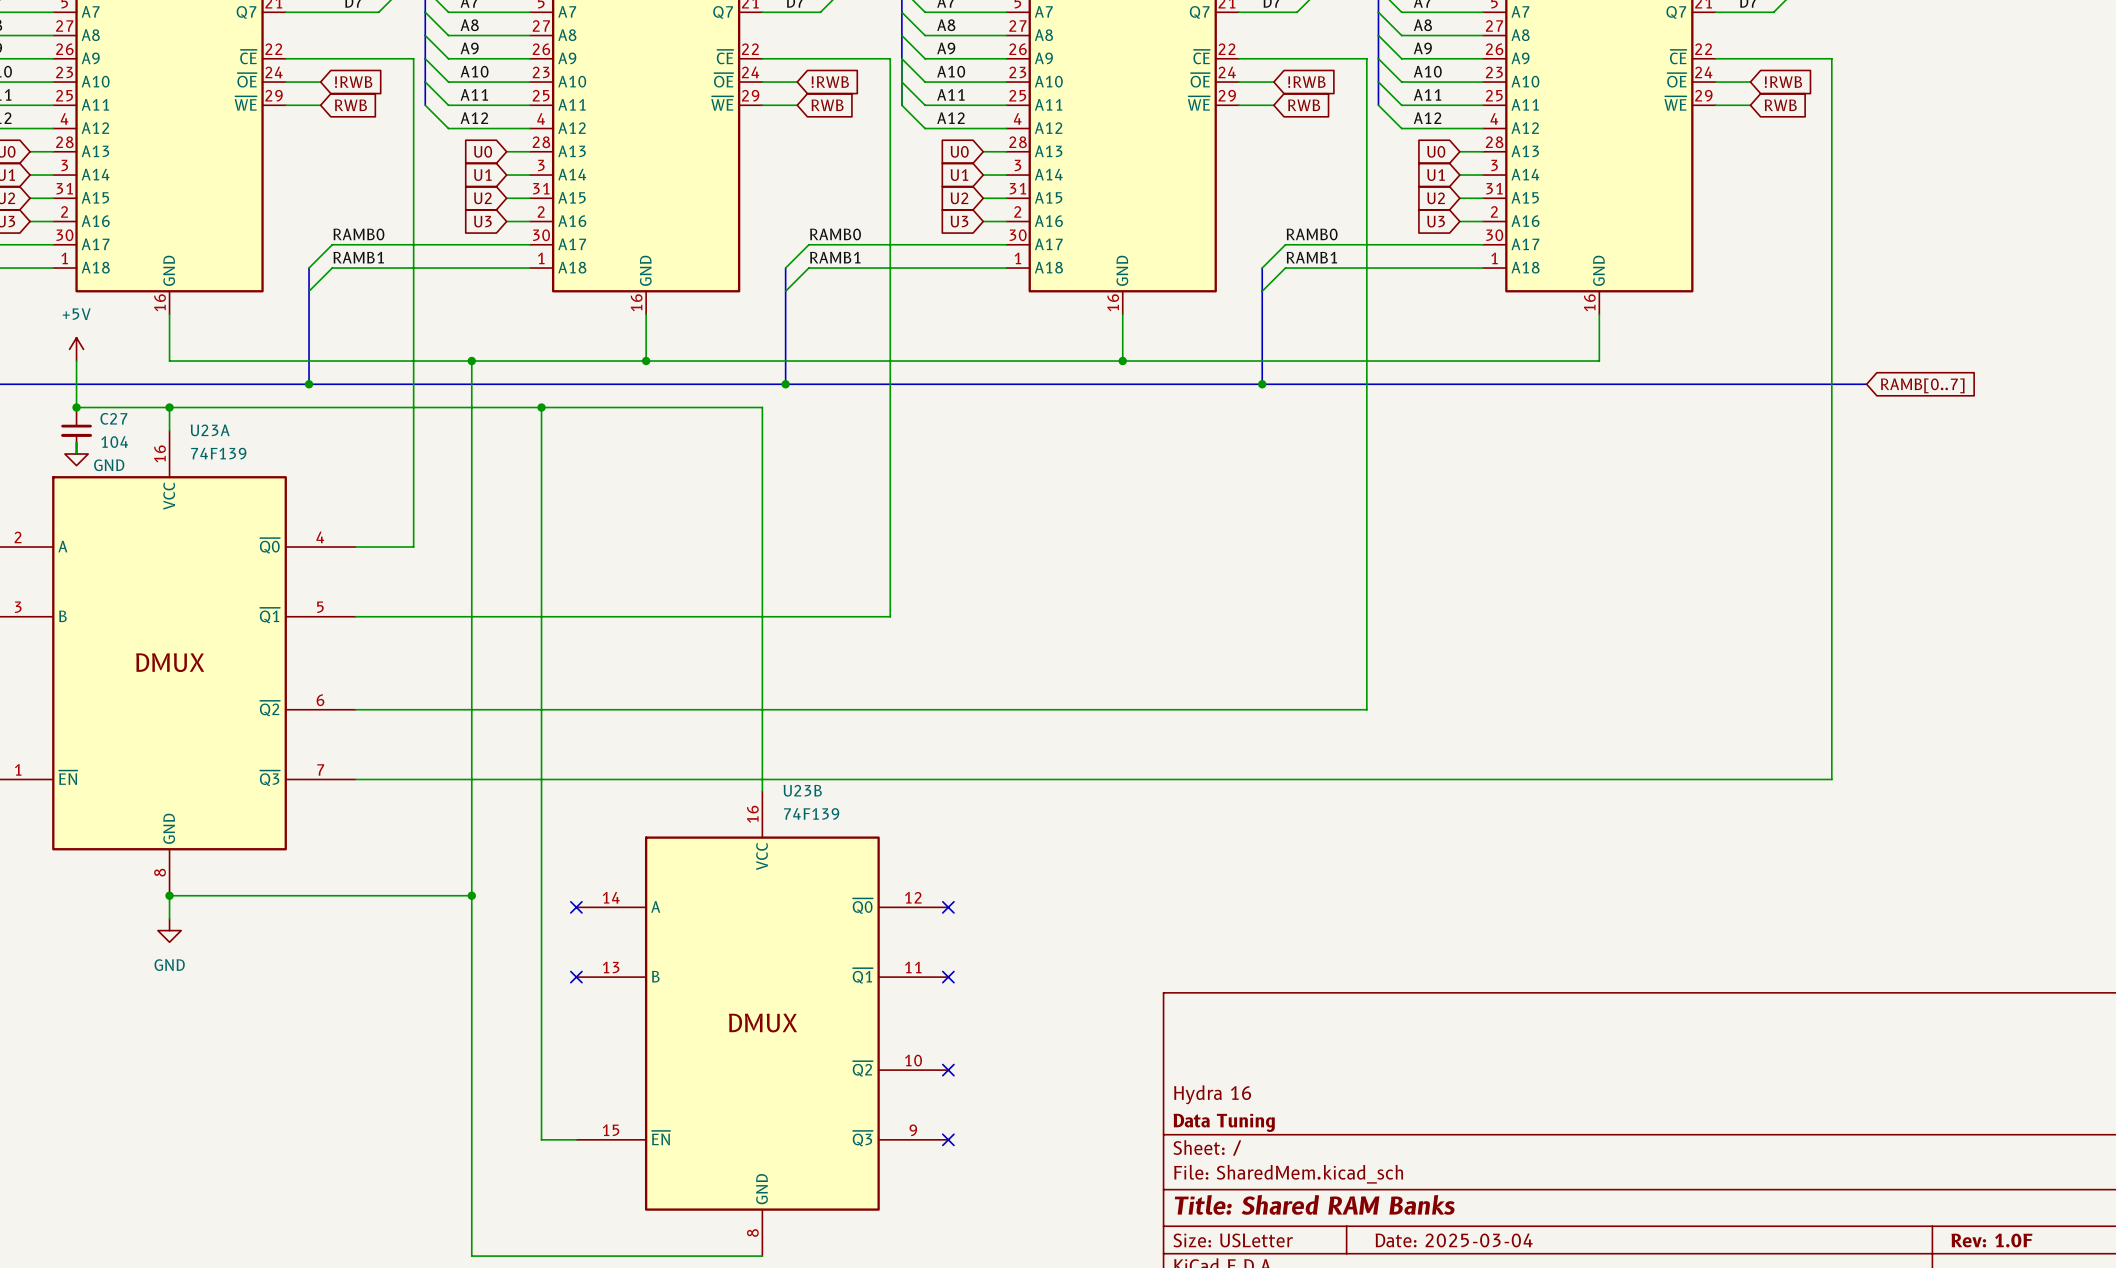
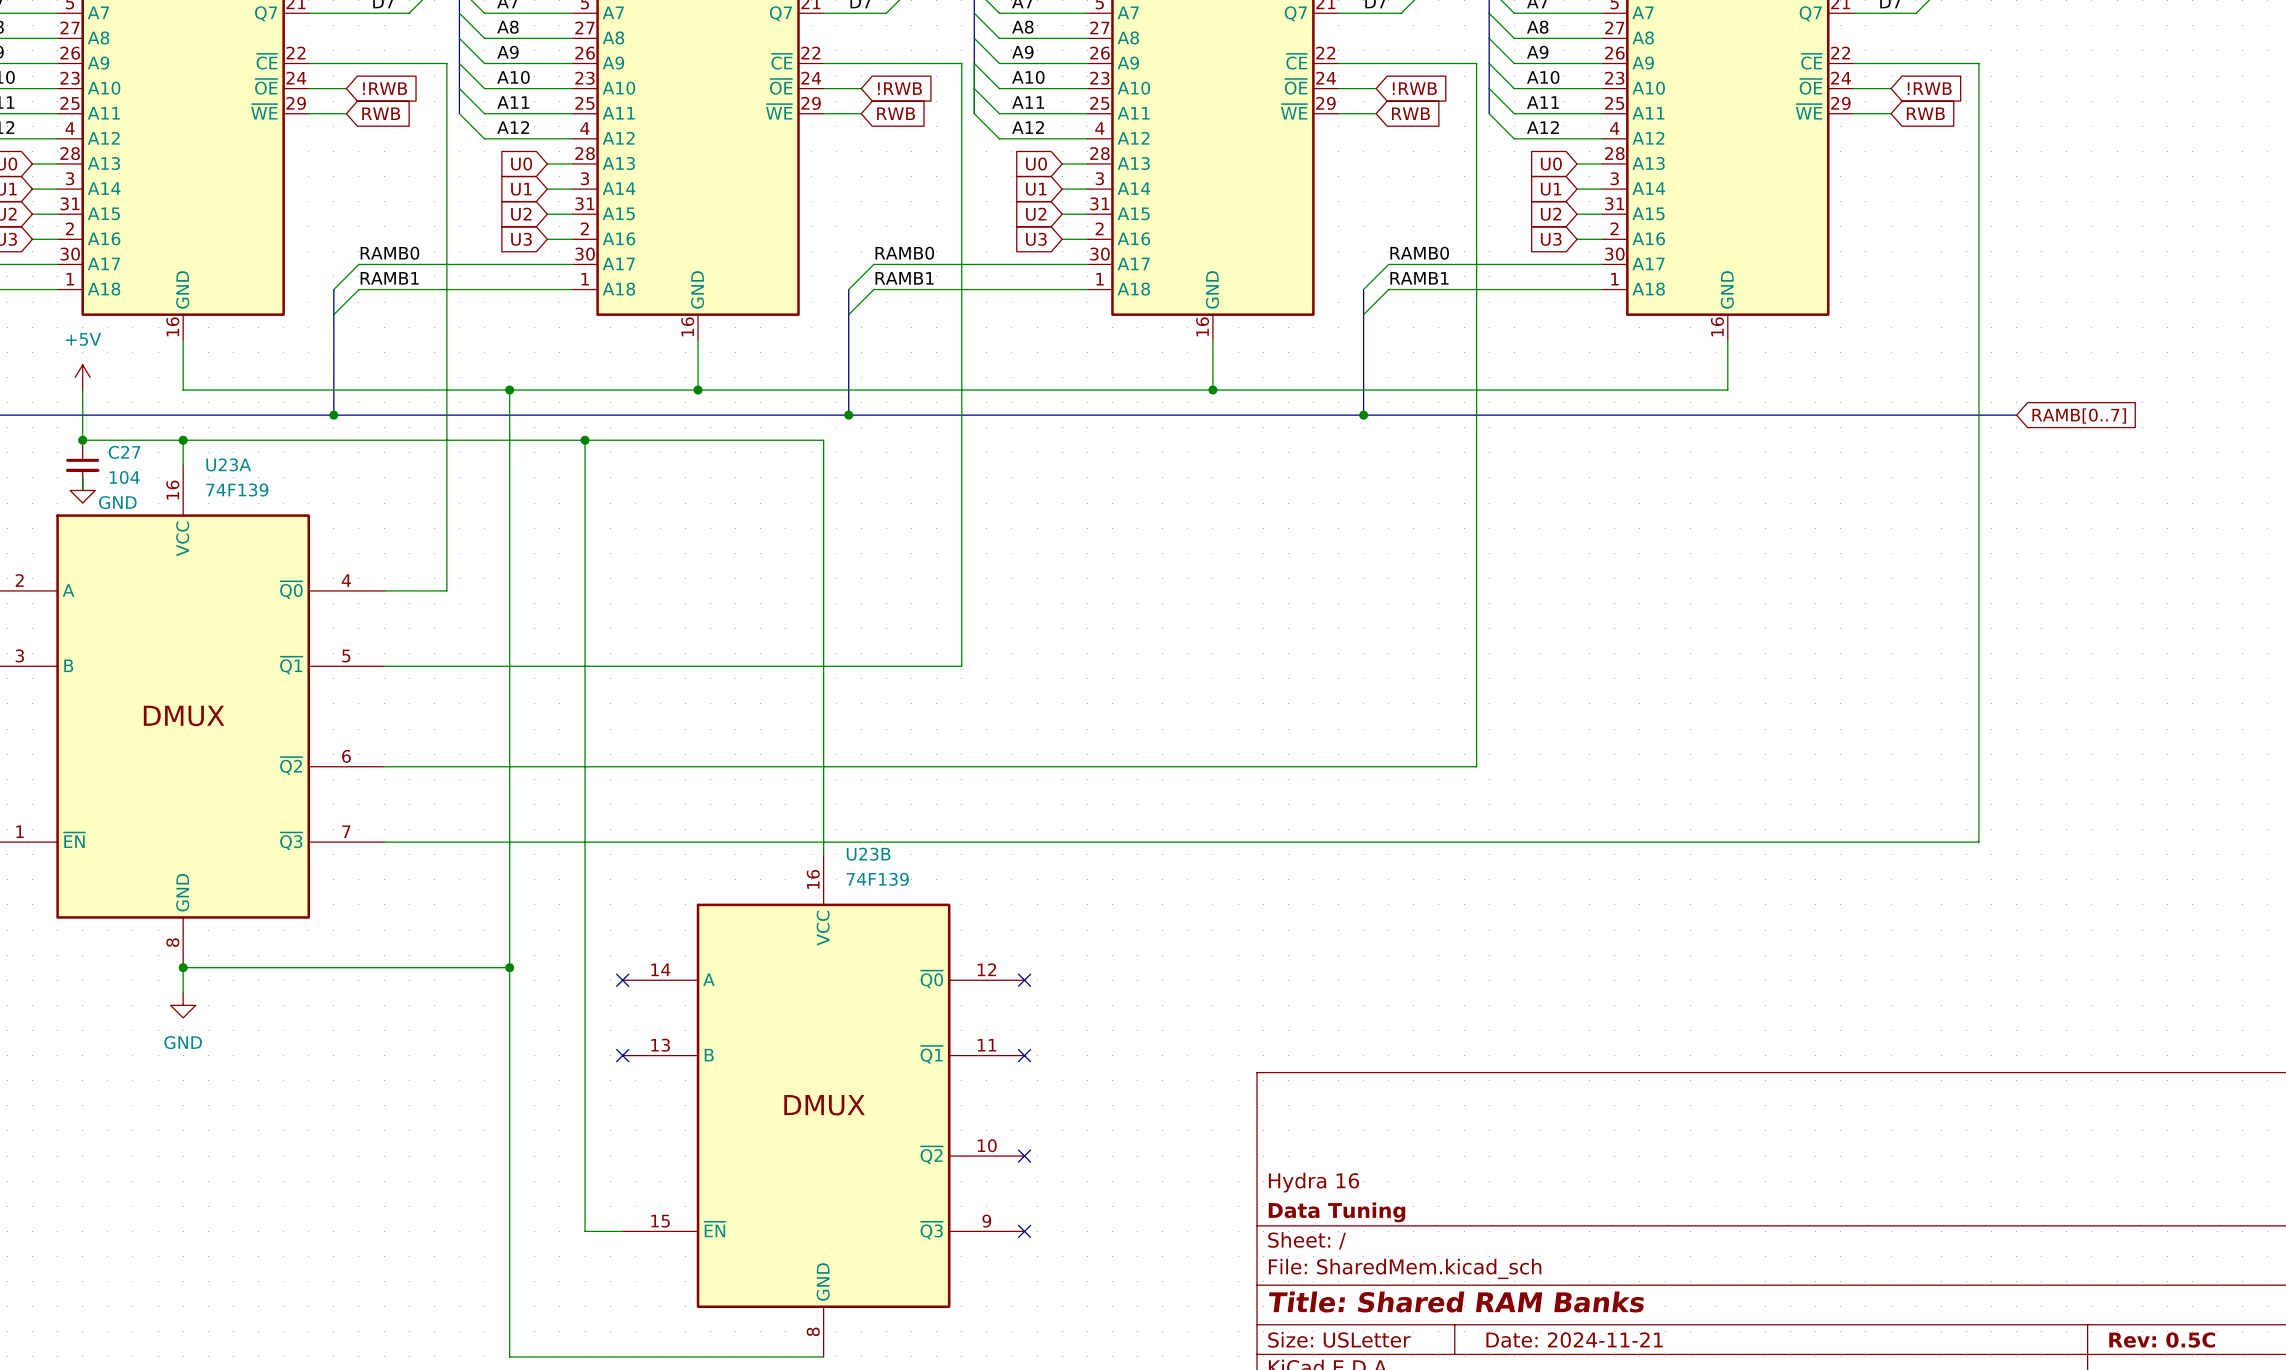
title block: Date: 2025-03-04 (1454, 1240) -> Date: 2024-11-21 (1574, 1340)
title block: Rev: 1.0F (1991, 1240) -> Rev: 0.5C (2162, 1340)

